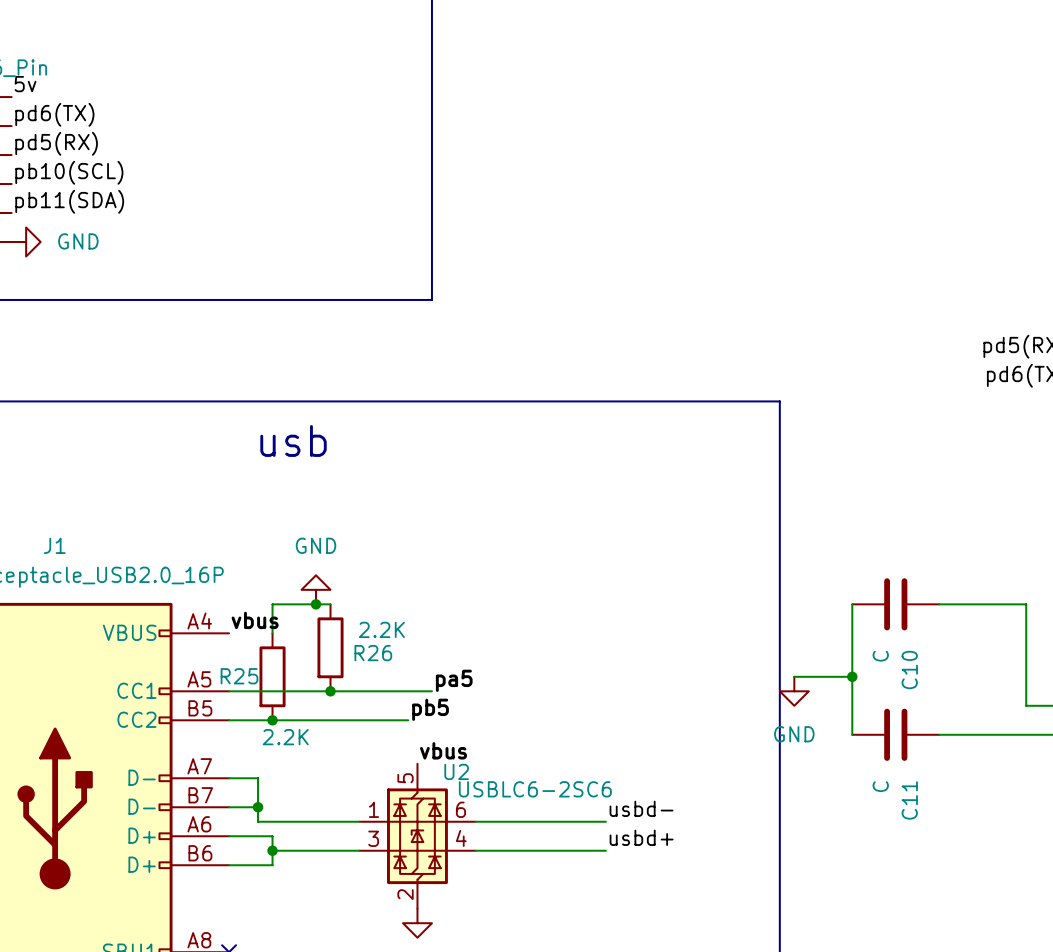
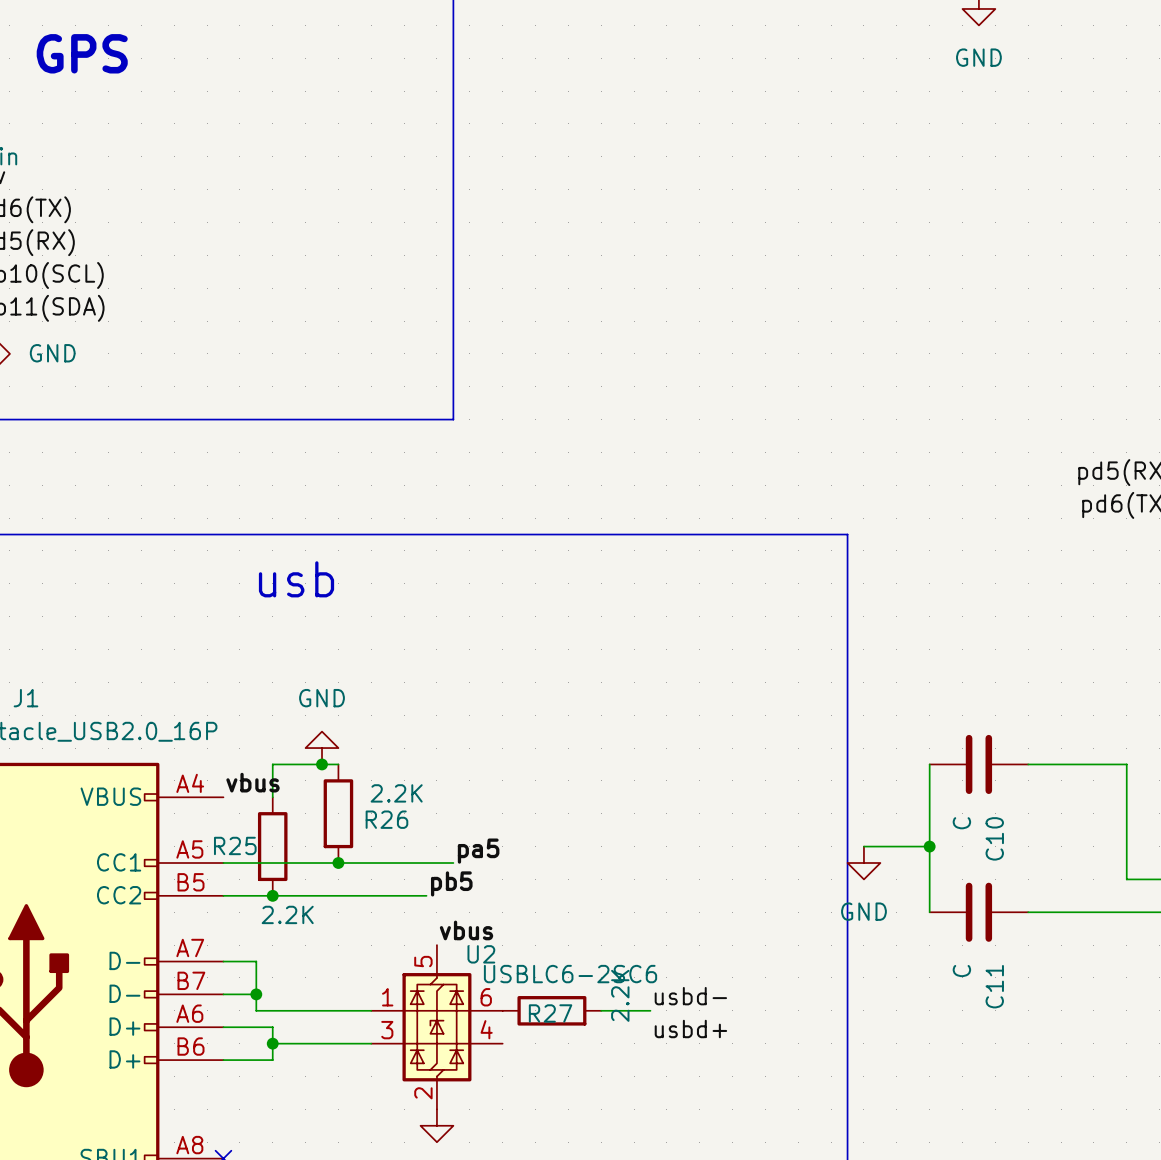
wire: (475, 821) (562, 821) -> none
R27: none -> 2.2K (551, 1010)
wire: (475, 850) (605, 850) -> none

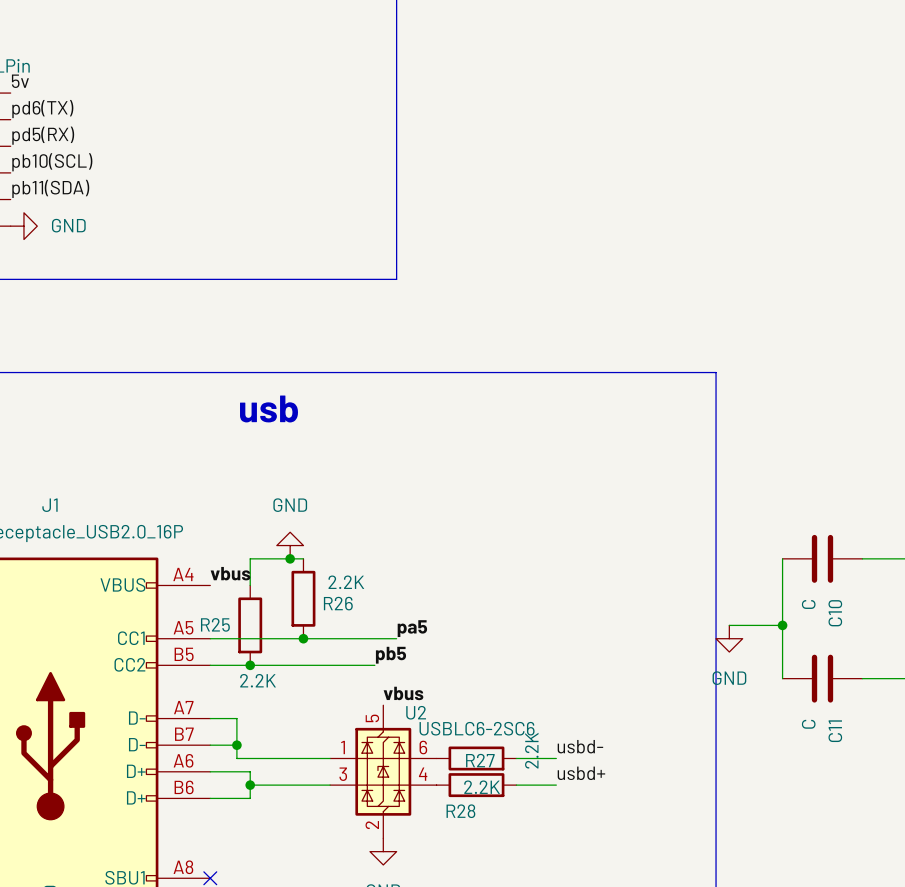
R28: none -> 2.2K (476, 785)
wire: none -> (516, 785) (556, 785)

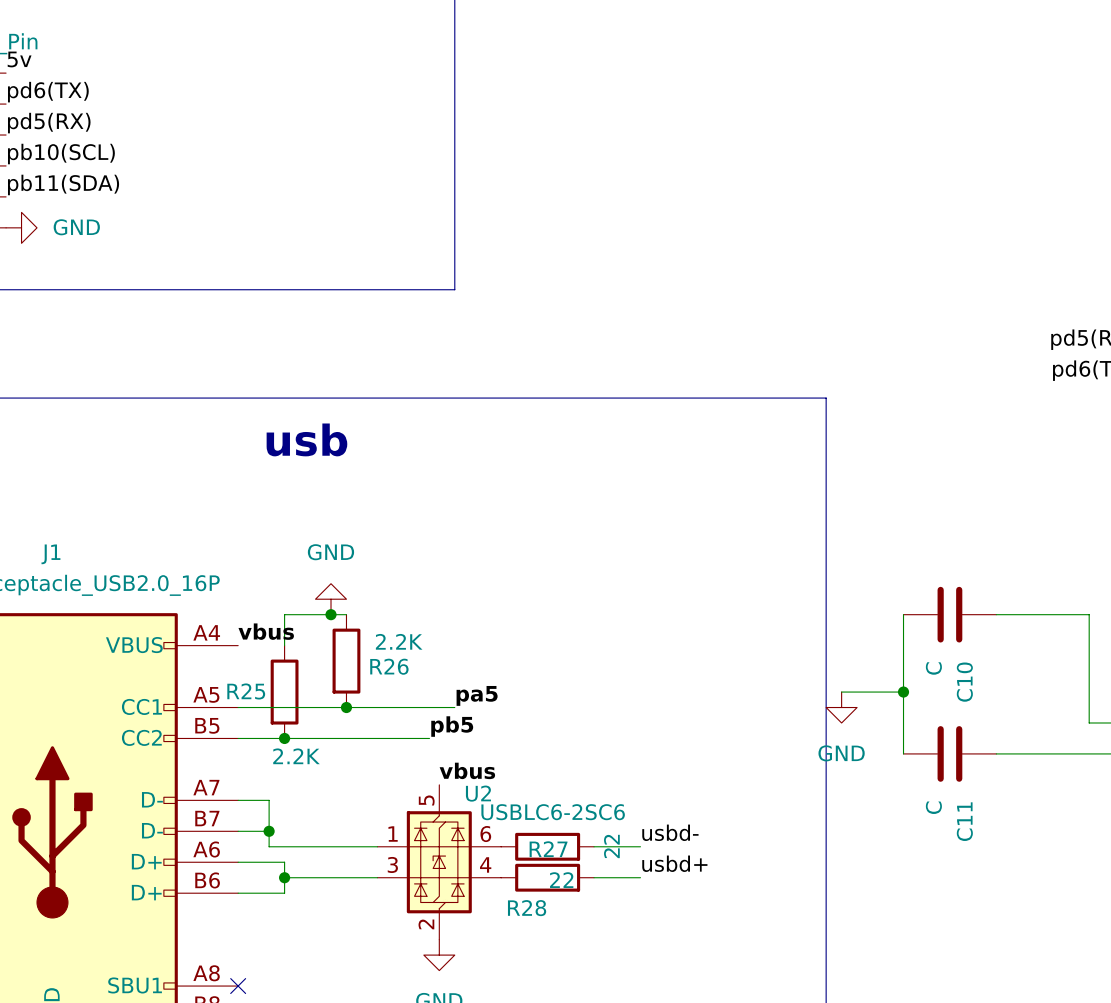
R27 value: 2.2K (531, 750) -> 22 (611, 846)
R28 value: 2.2K (482, 787) -> 22 (561, 880)

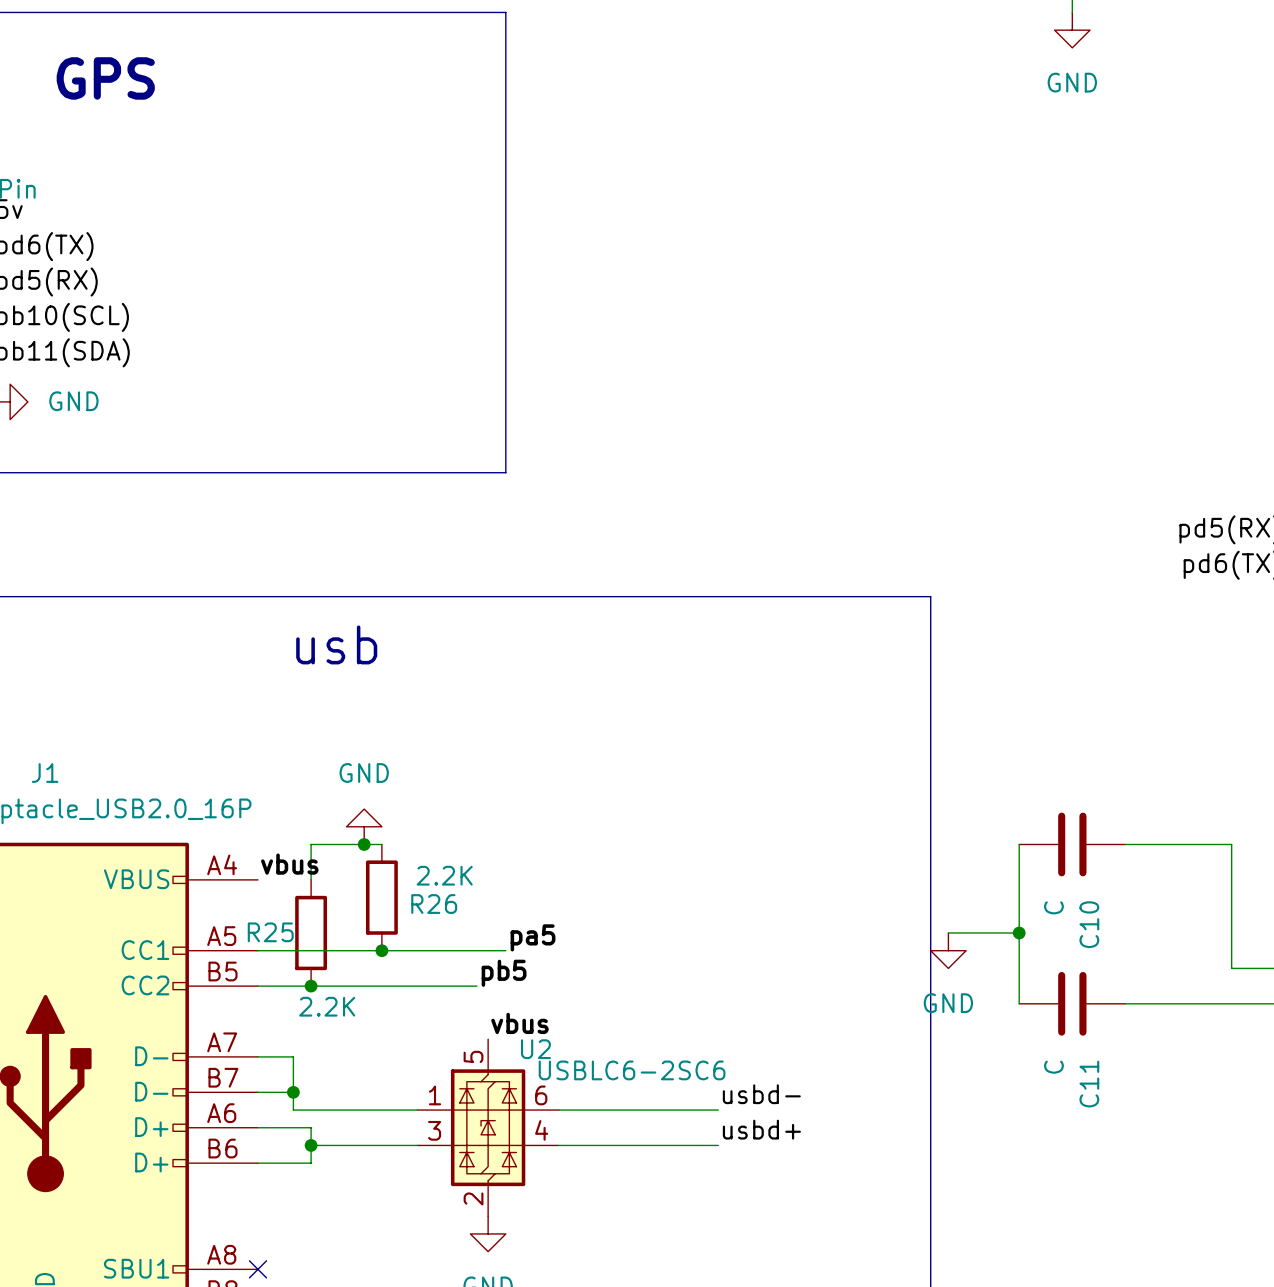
wire: none -> (558, 1110) (665, 1110)
R27: 22 (547, 846) -> none
wire: none -> (558, 1145) (665, 1145)
R28: 22 (547, 877) -> none

